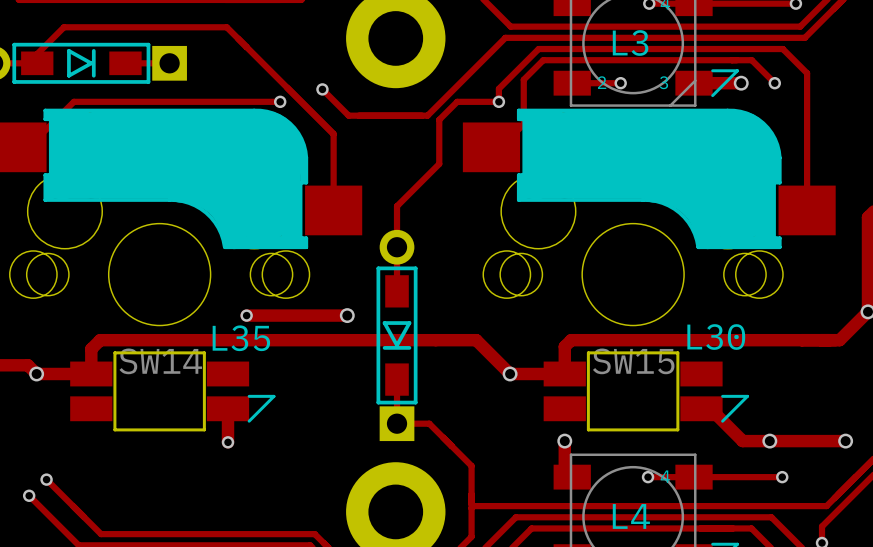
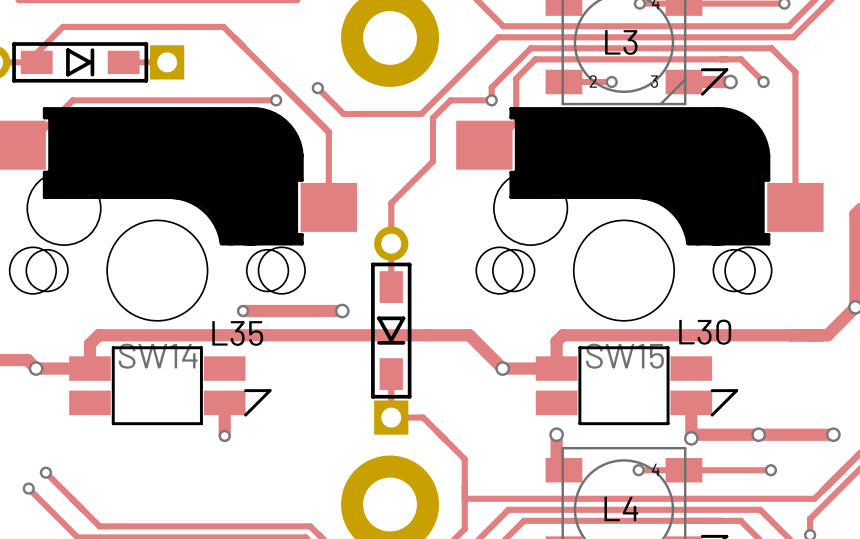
track: (701, 408) (710, 408) (742, 441) -> (691, 402) (691, 438) (695, 434) (731, 434)
via: none -> (691, 438)

